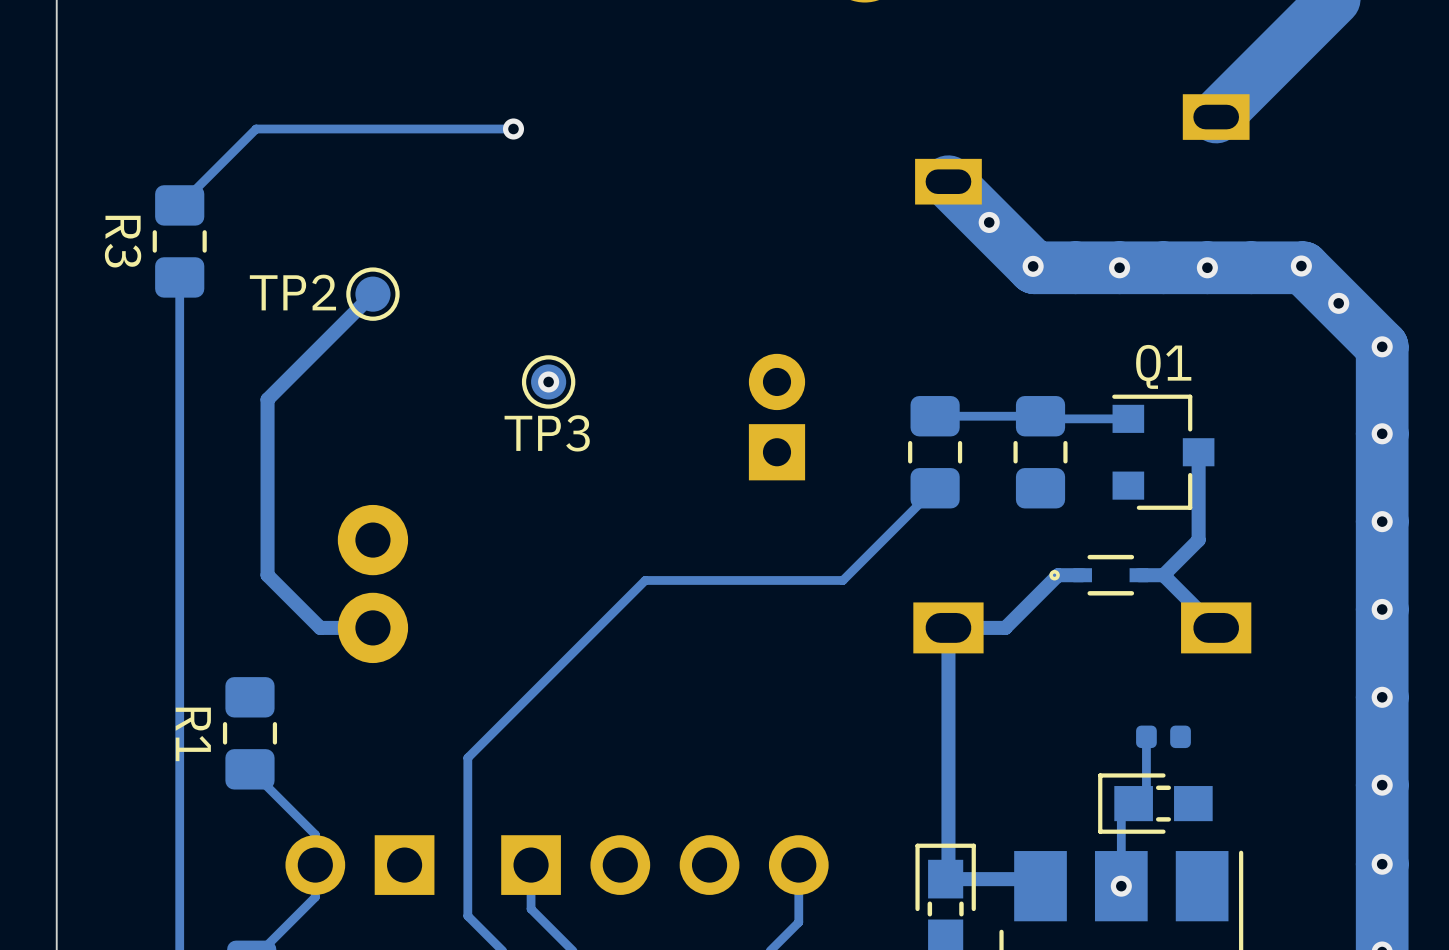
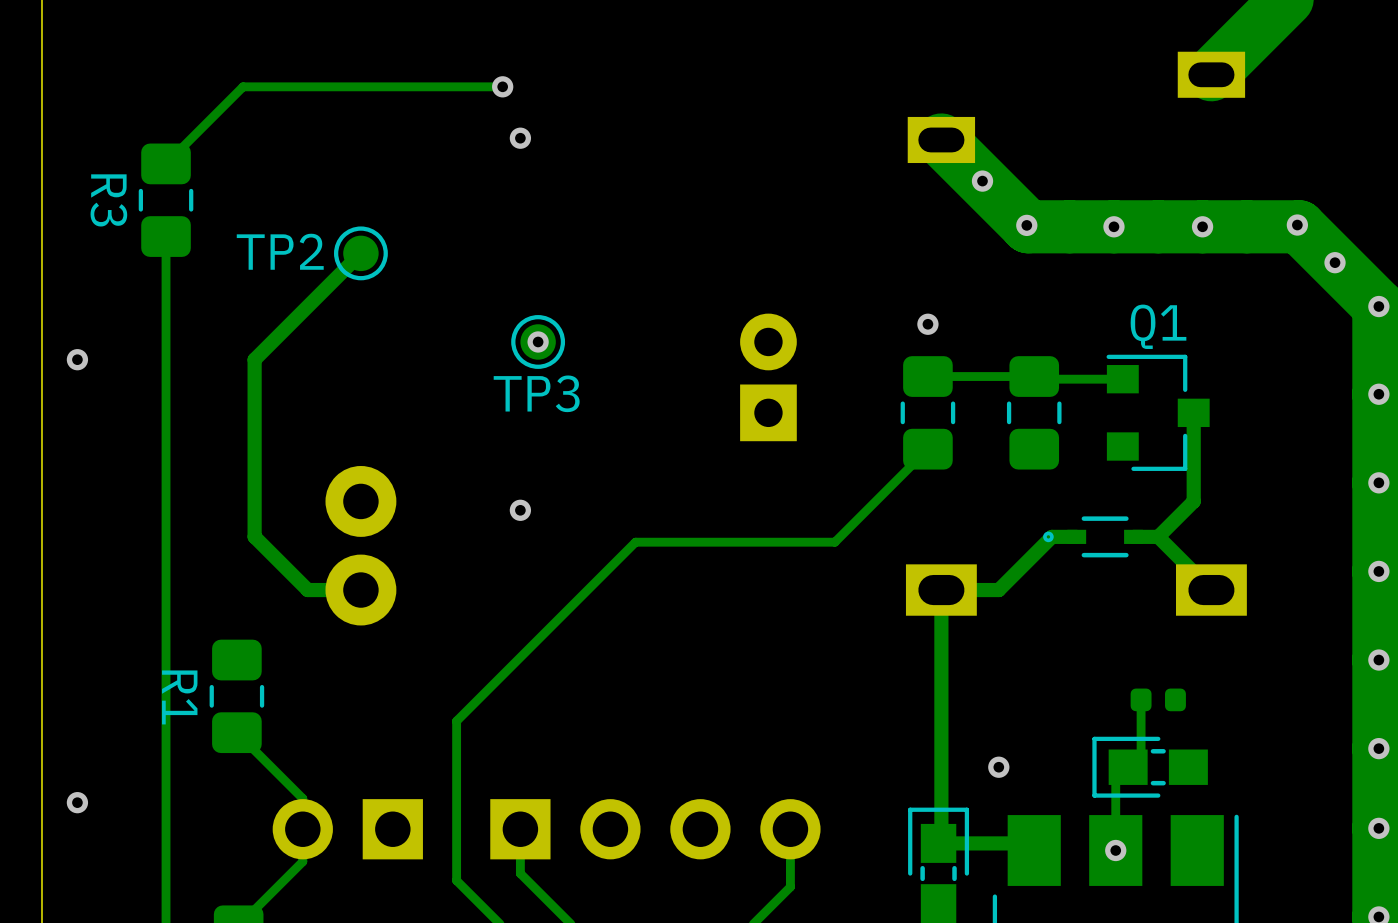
via: none -> (520, 138)
via: none -> (927, 324)
via: none -> (77, 359)
via: none -> (520, 510)
via: none -> (998, 767)
via: none -> (77, 802)

